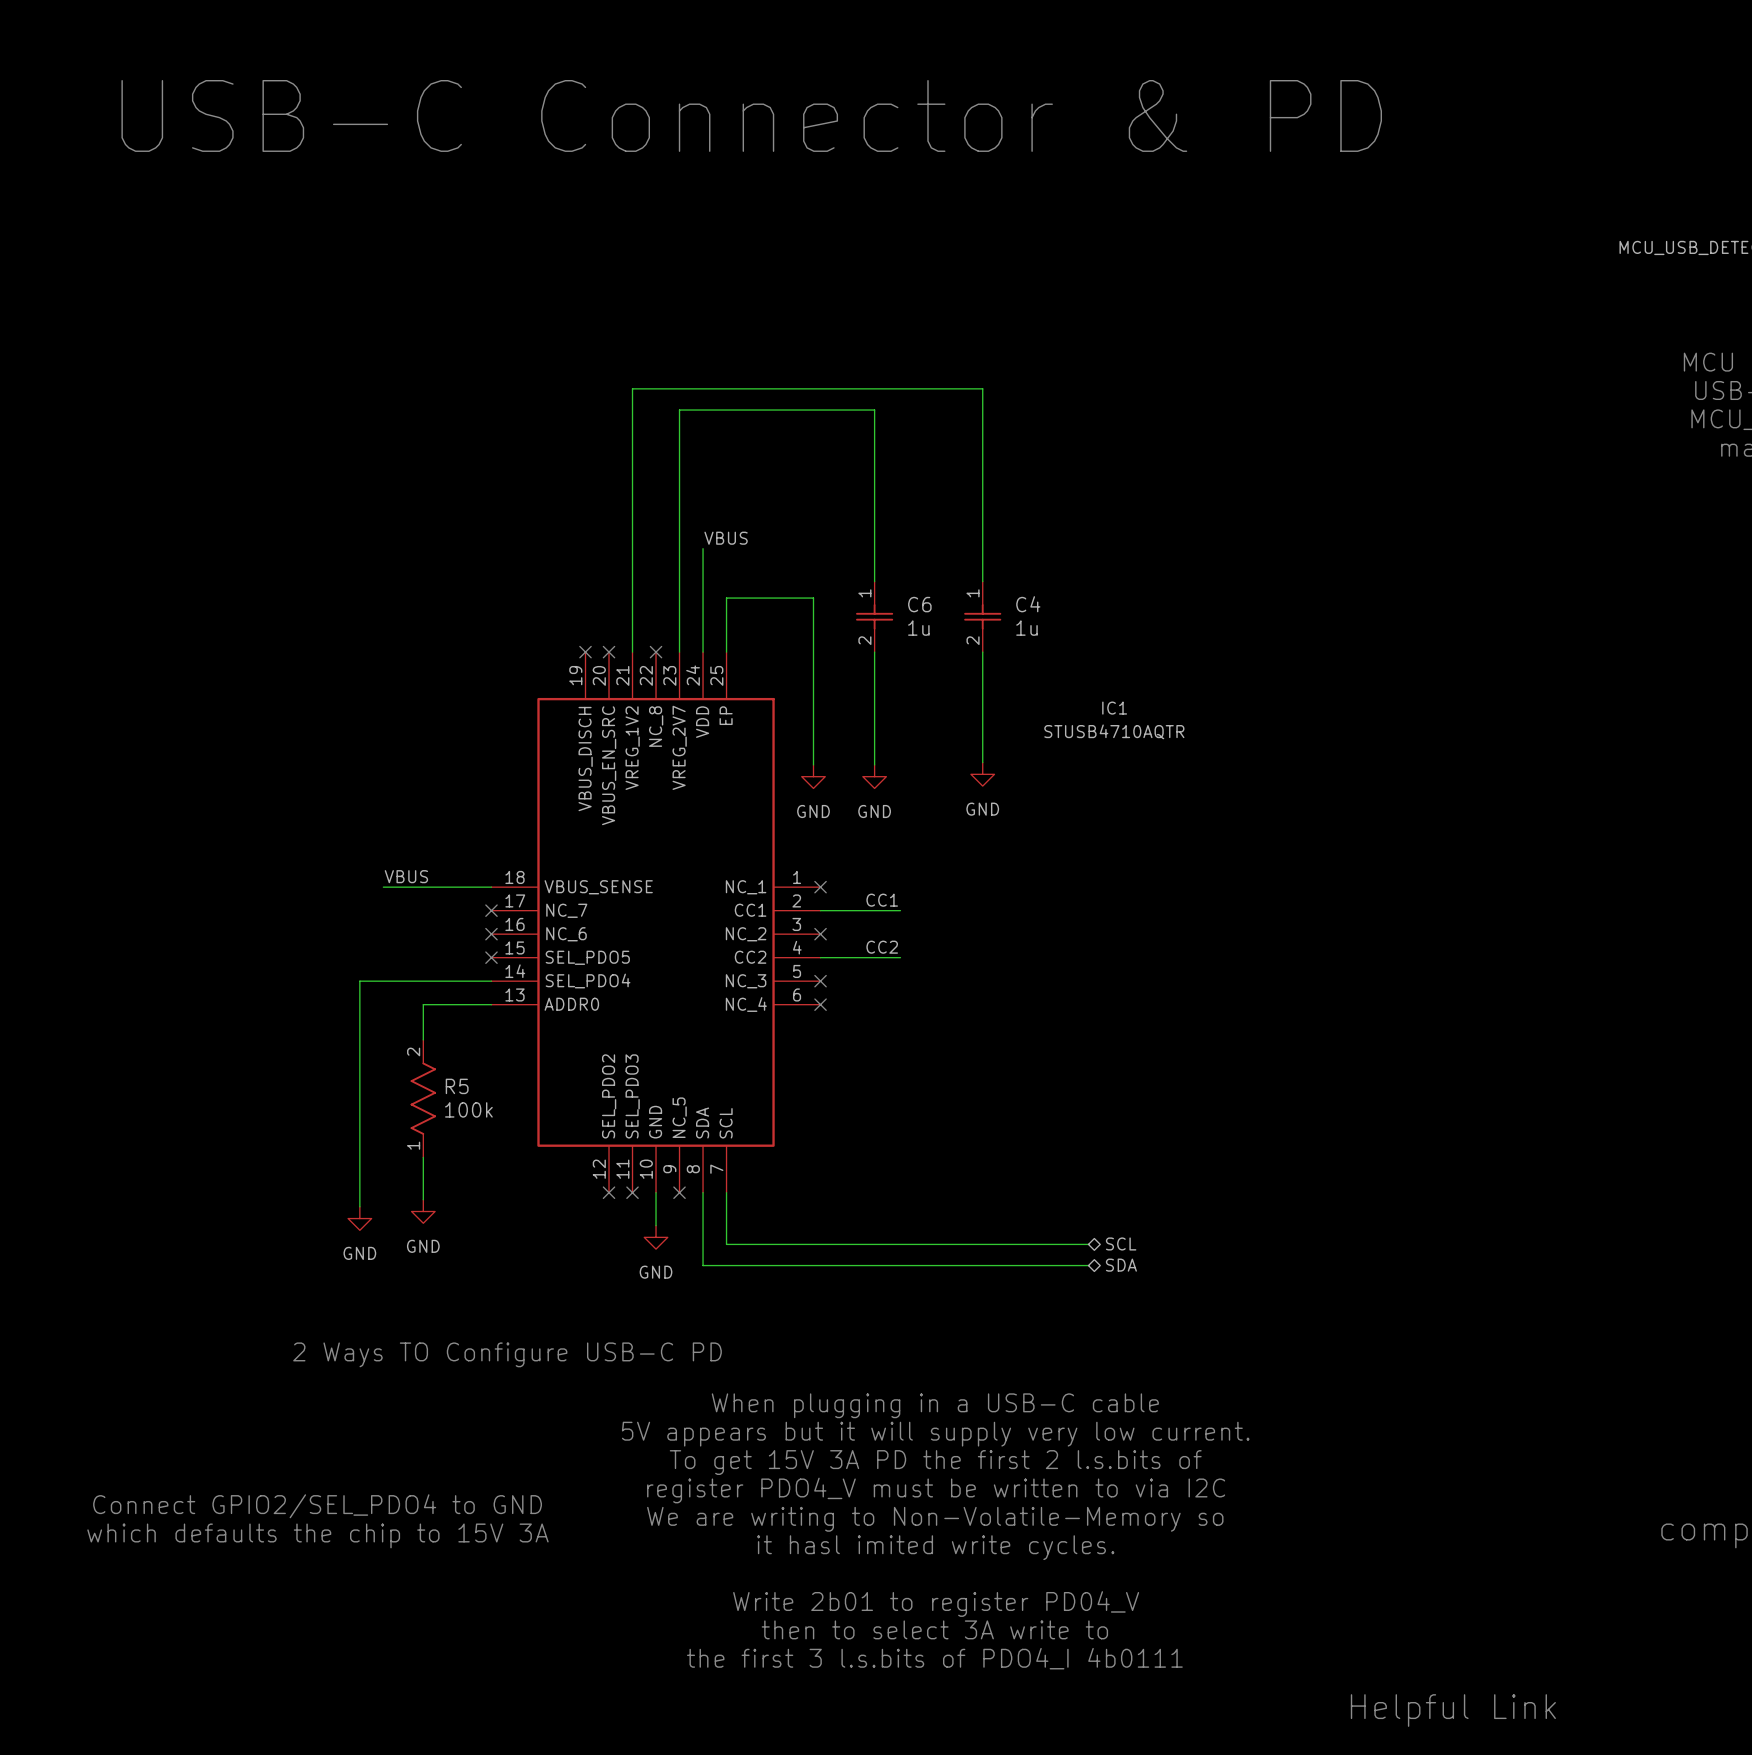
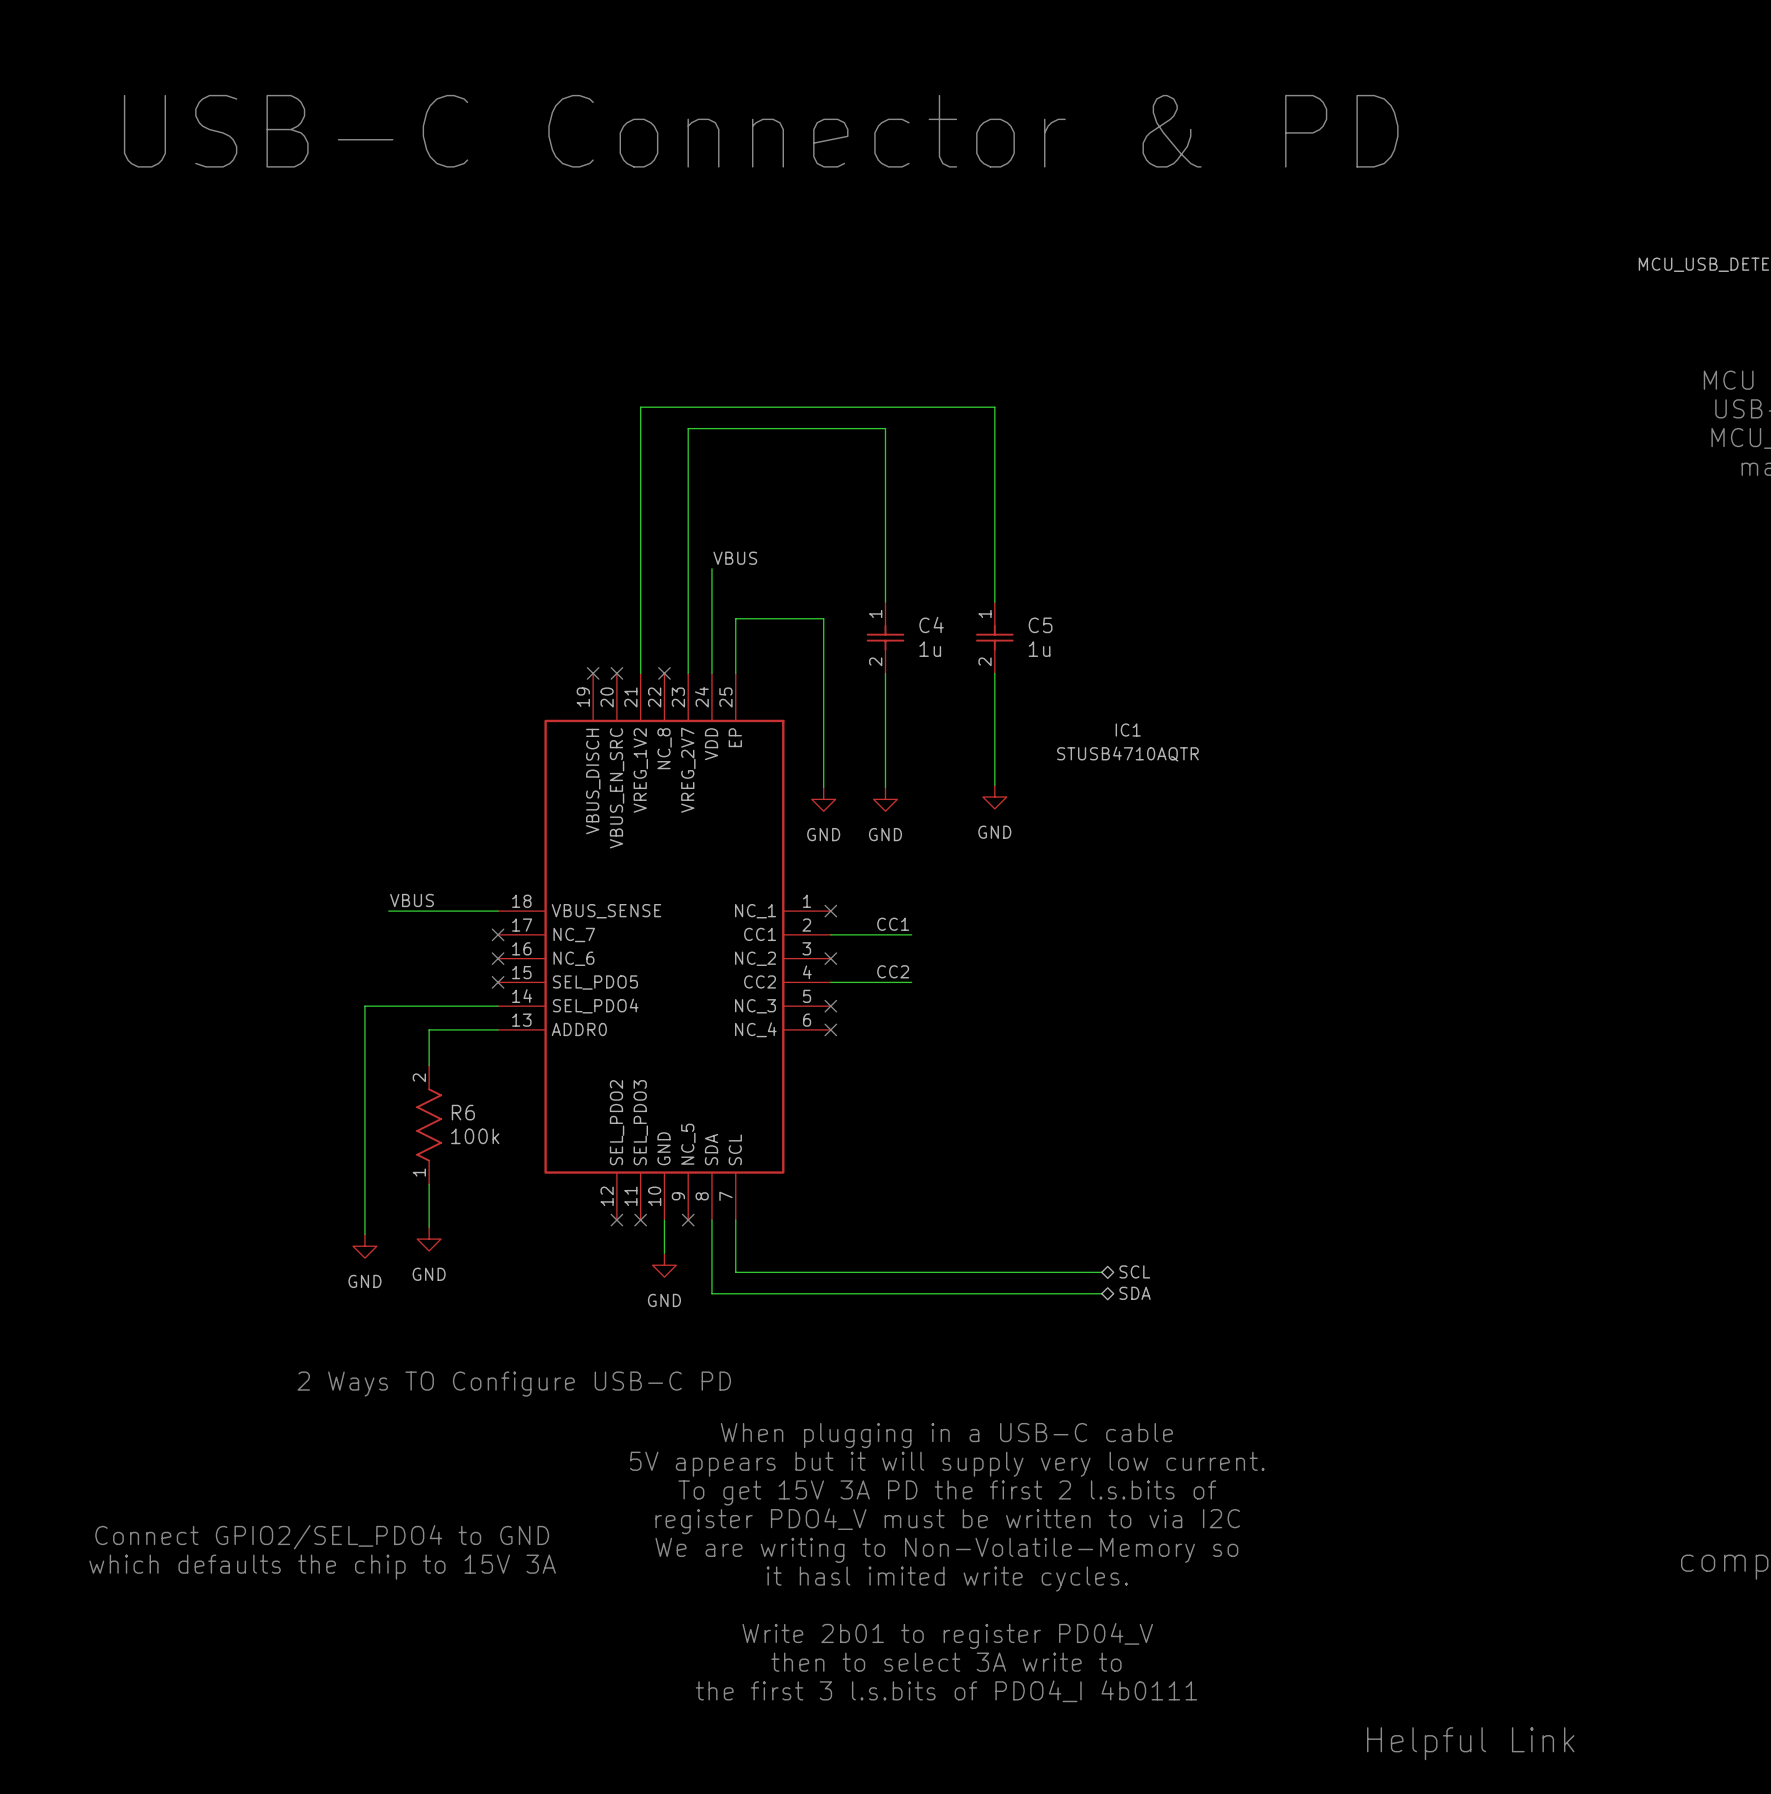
C6 name: C6 (919, 604) -> C4 (931, 625)
C4 name: C4 (1028, 604) -> C5 (1040, 625)
R5 name: R5 (457, 1086) -> R6 (463, 1112)

